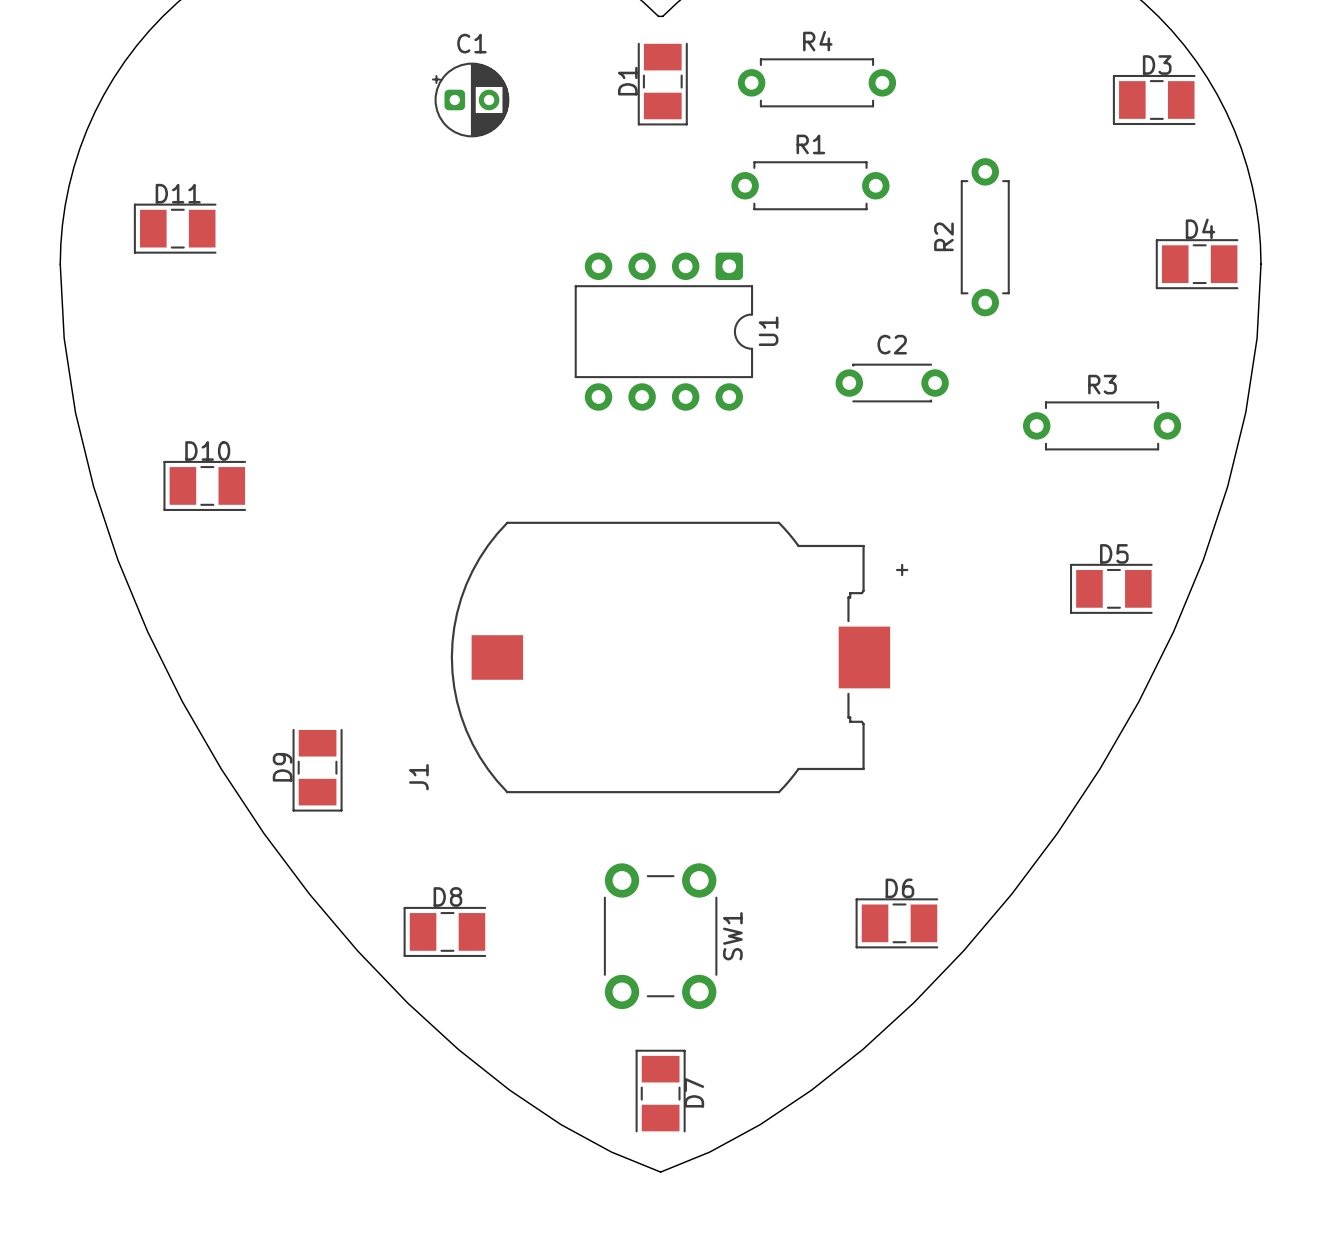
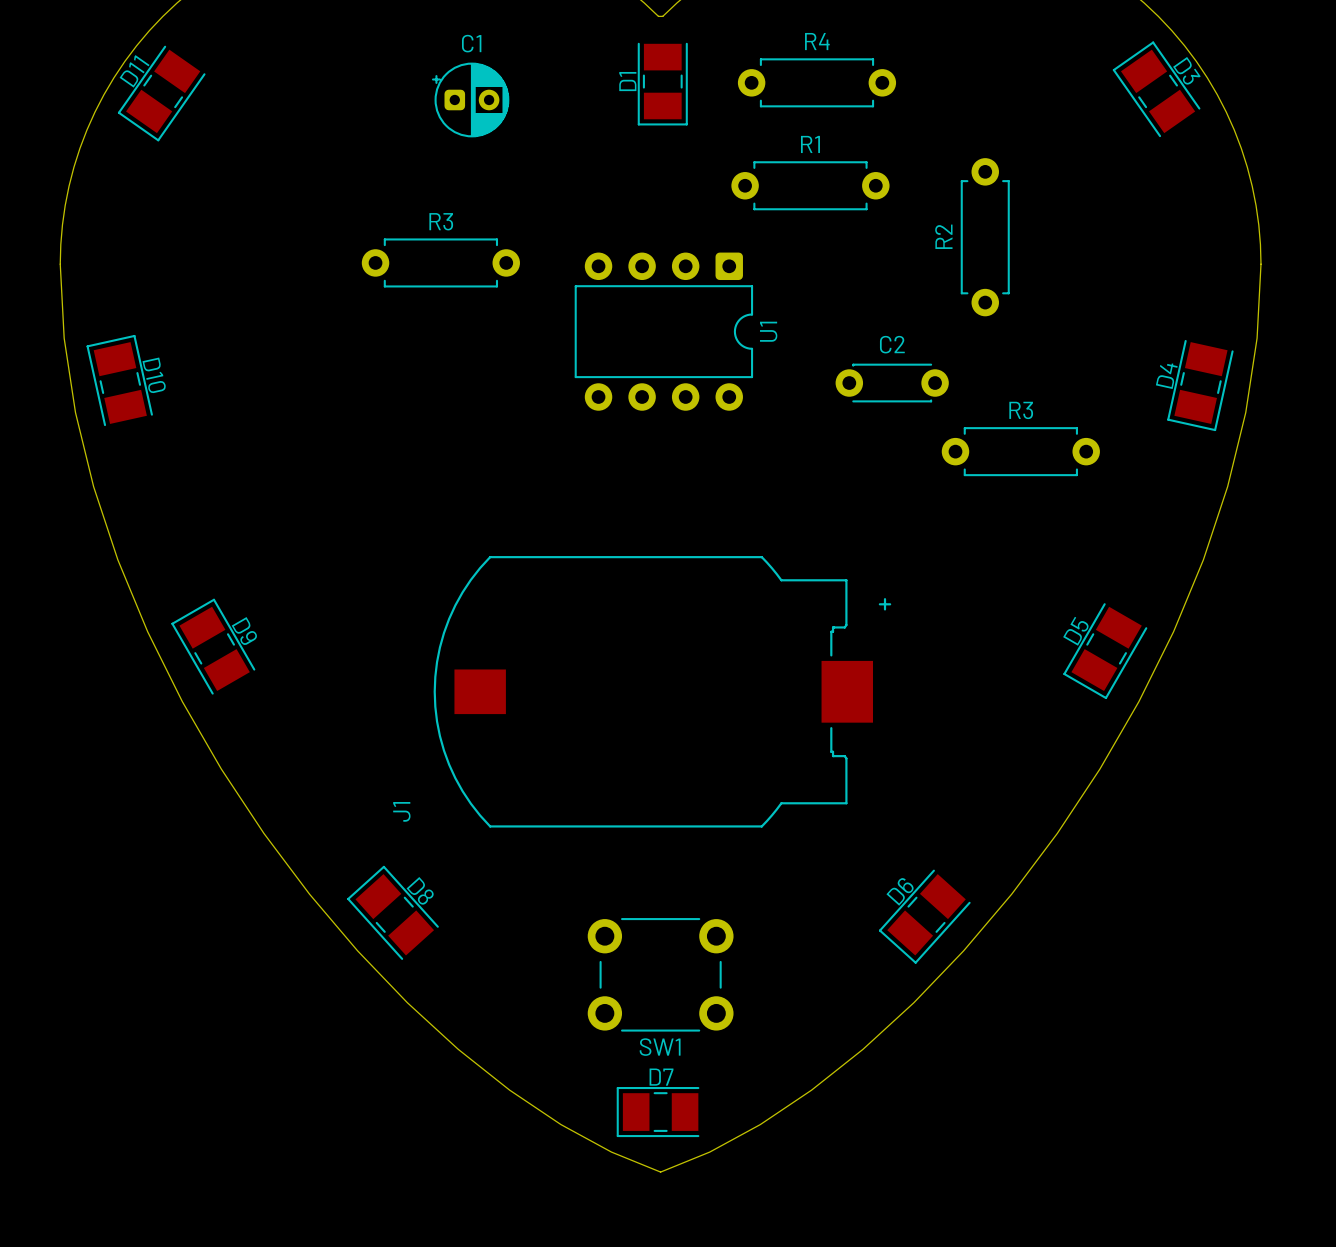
D3 rotation: 0° (1154, 99) -> 55° clockwise (1156, 89)
D11 rotation: 0° (175, 228) -> 55° counterclockwise (161, 93)
D11 position: (175, 228) -> (161, 93)
R3: none -> (440, 262)
D4 rotation: 0° (1197, 264) -> 77.5° counterclockwise (1200, 385)
D4 position: (1197, 264) -> (1200, 385)
R3 position: (1102, 425) -> (1020, 451)
D10 rotation: 0° (204, 485) -> 77.5° clockwise (119, 380)
D10 position: (204, 485) -> (119, 380)
D5 rotation: 0° (1111, 588) -> 60° counterclockwise (1105, 651)
D5 position: (1111, 588) -> (1105, 651)
J1 position: (679, 657) -> (662, 691)
D9 rotation: 0° (317, 770) -> 150° clockwise (213, 646)
D9 position: (317, 770) -> (213, 646)
D6 rotation: 0° (896, 923) -> 48° counterclockwise (924, 916)
D8 rotation: 0° (444, 931) -> 48° clockwise (393, 912)
D8 position: (444, 931) -> (393, 912)
SW1 rotation: 0° (660, 936) -> 90° clockwise (660, 974)
D7 rotation: 0° (660, 1091) -> 90° counterclockwise (658, 1112)

